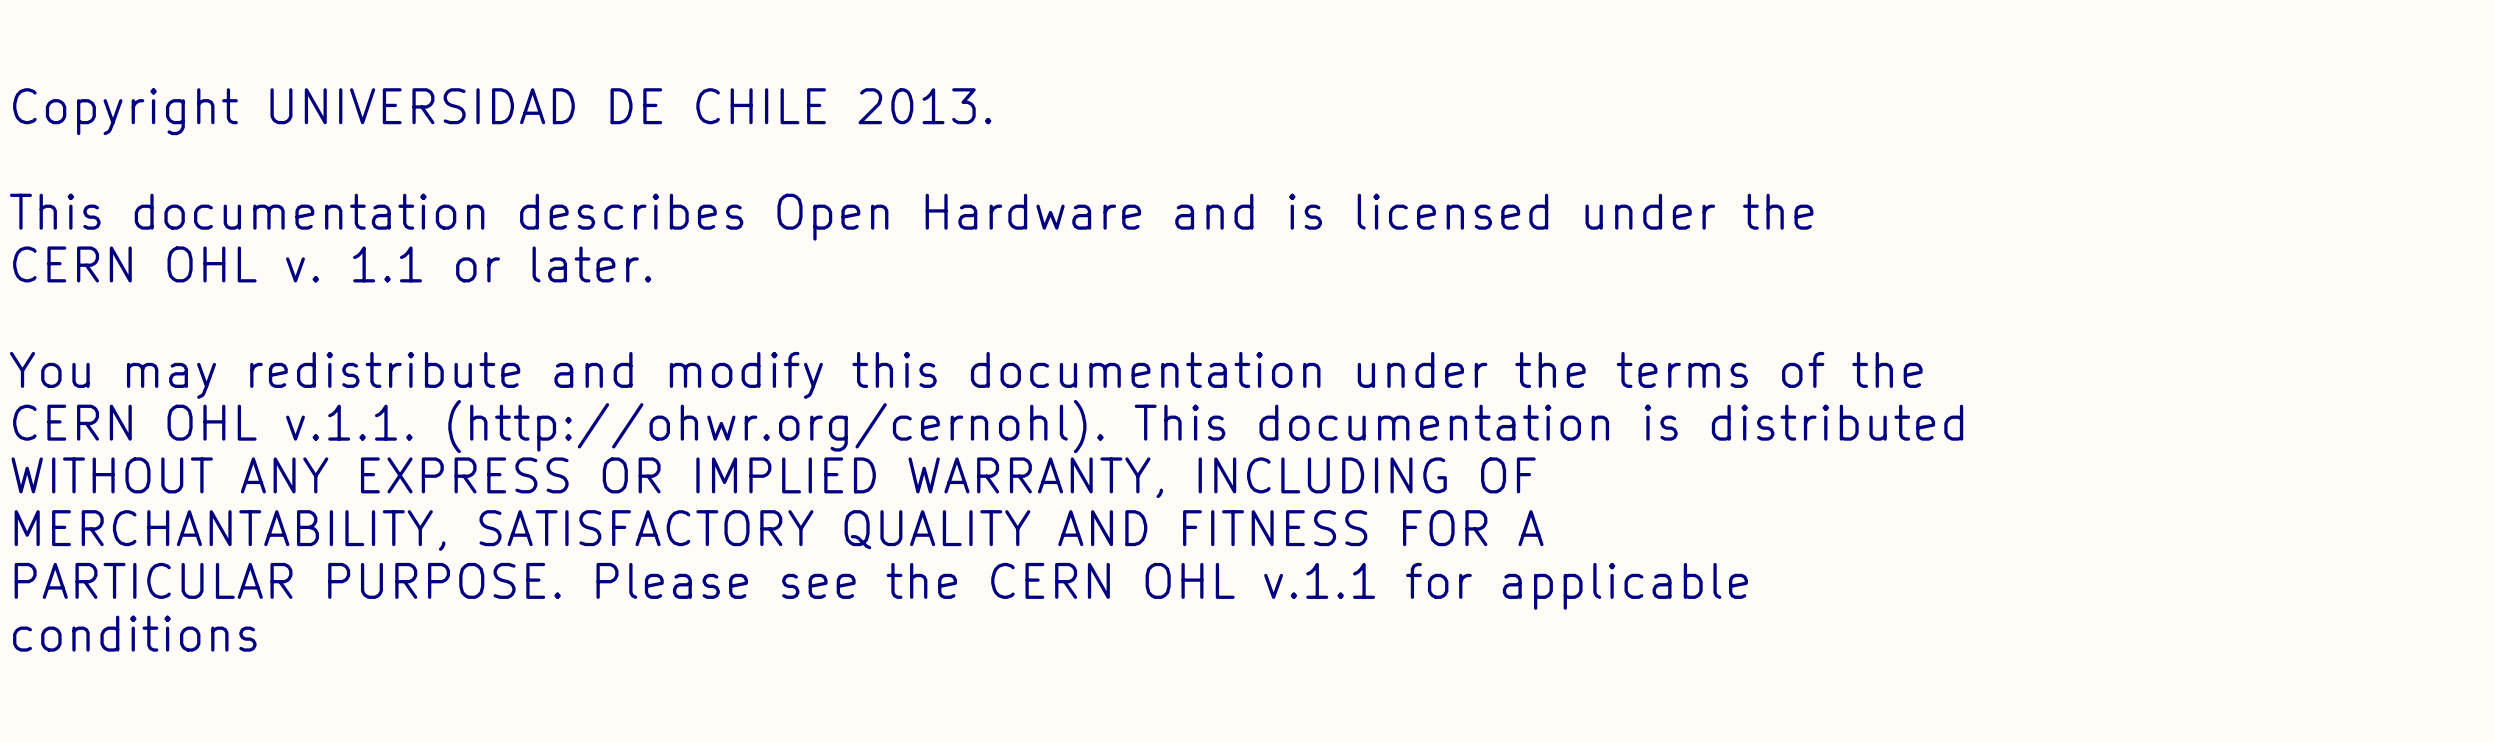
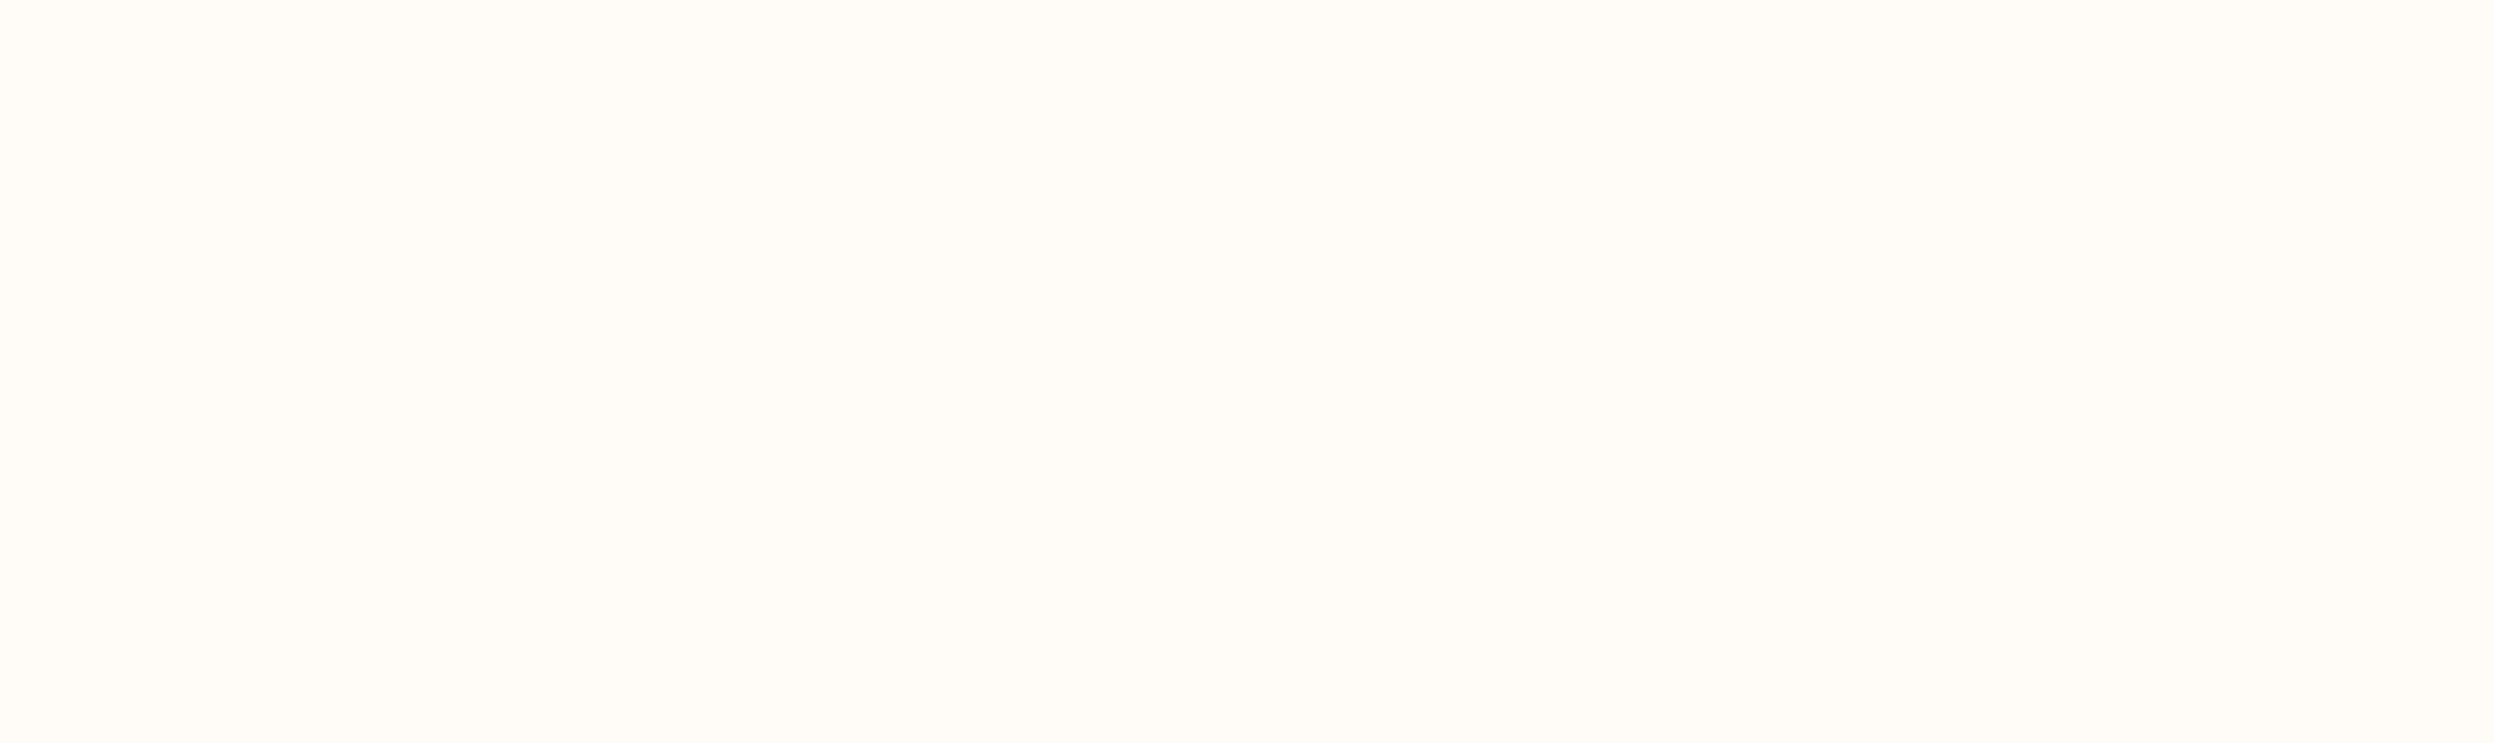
text: Copyright UNIVERSIDAD DE CHILE 2013. (502, 111) -> none
text: This documentation describes Open Hardware and is licensed under the (911, 217) -> none
text: CERN OHL v. 1.1 or later. (332, 264) -> none
text: You may redistribute and modify this documentation under the terms of the (966, 375) -> none
text: CERN OHL v.1.1. (http://ohwr.org/cernohl). This documentation is distributed (988, 426) -> none
text: WITHOUT ANY EXPRESS OR IMPLIED WARRANTY, INCLUDING OF (773, 477) -> none
text: MERCHANTABILITY, SATISFACTORY QUALITY AND FITNESS FOR A (779, 530) -> none
text: PARTICULAR PURPOSE. Please see the CERN OHL v.1.1 for applicable (881, 586) -> none
text: conditions (134, 633) -> none

